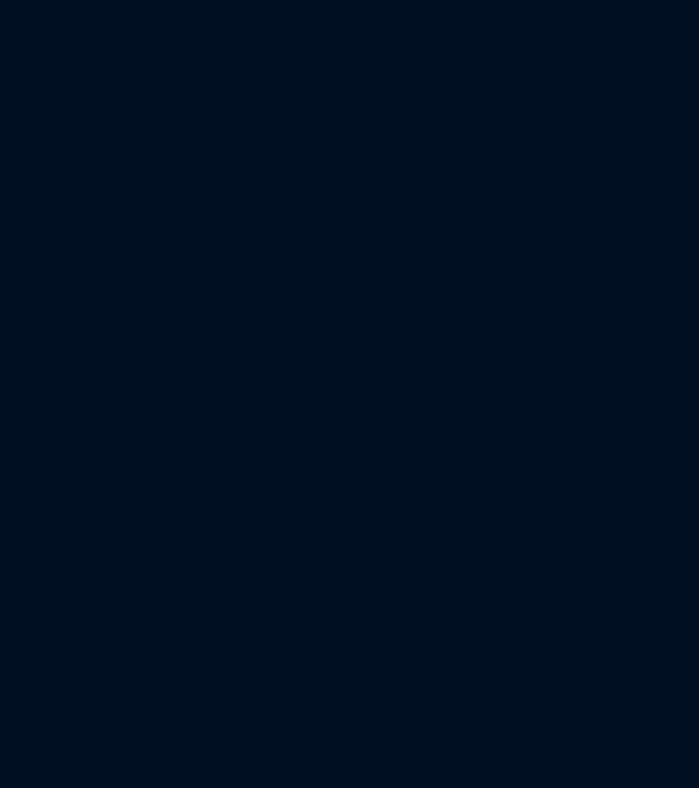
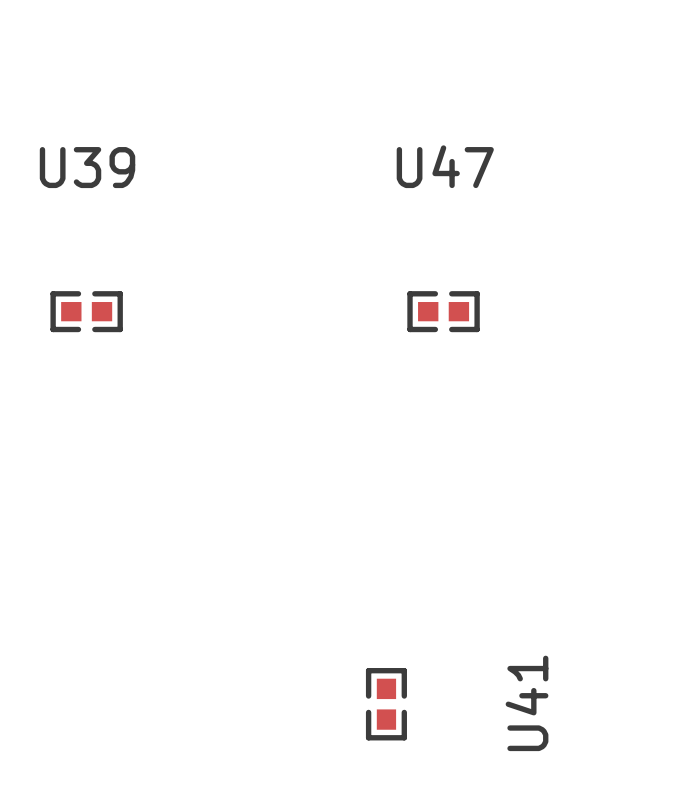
U39: none -> (86, 311)
U47: none -> (443, 311)
U41: none -> (386, 704)

